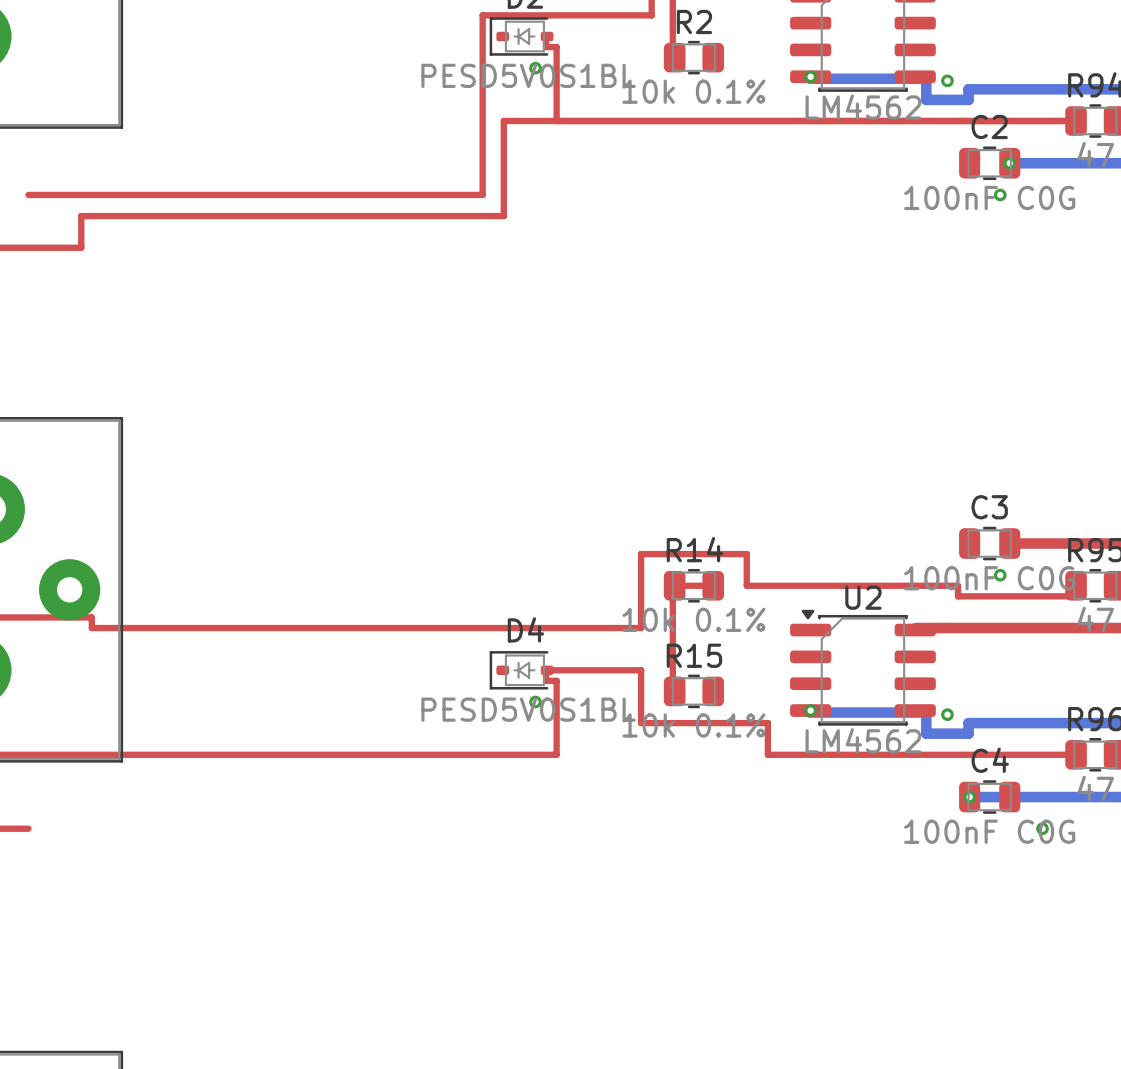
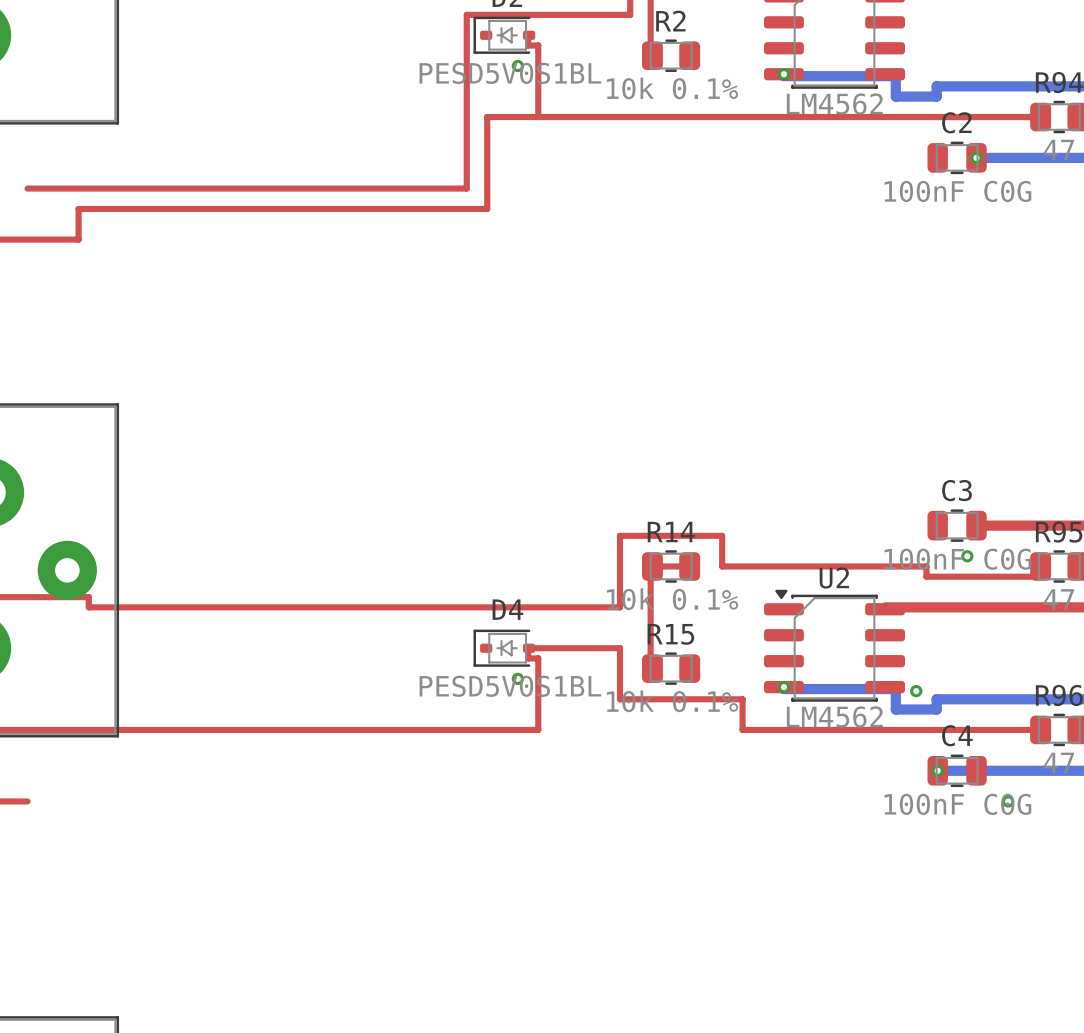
via: (947, 80) -> none
via: (1000, 194) -> none

